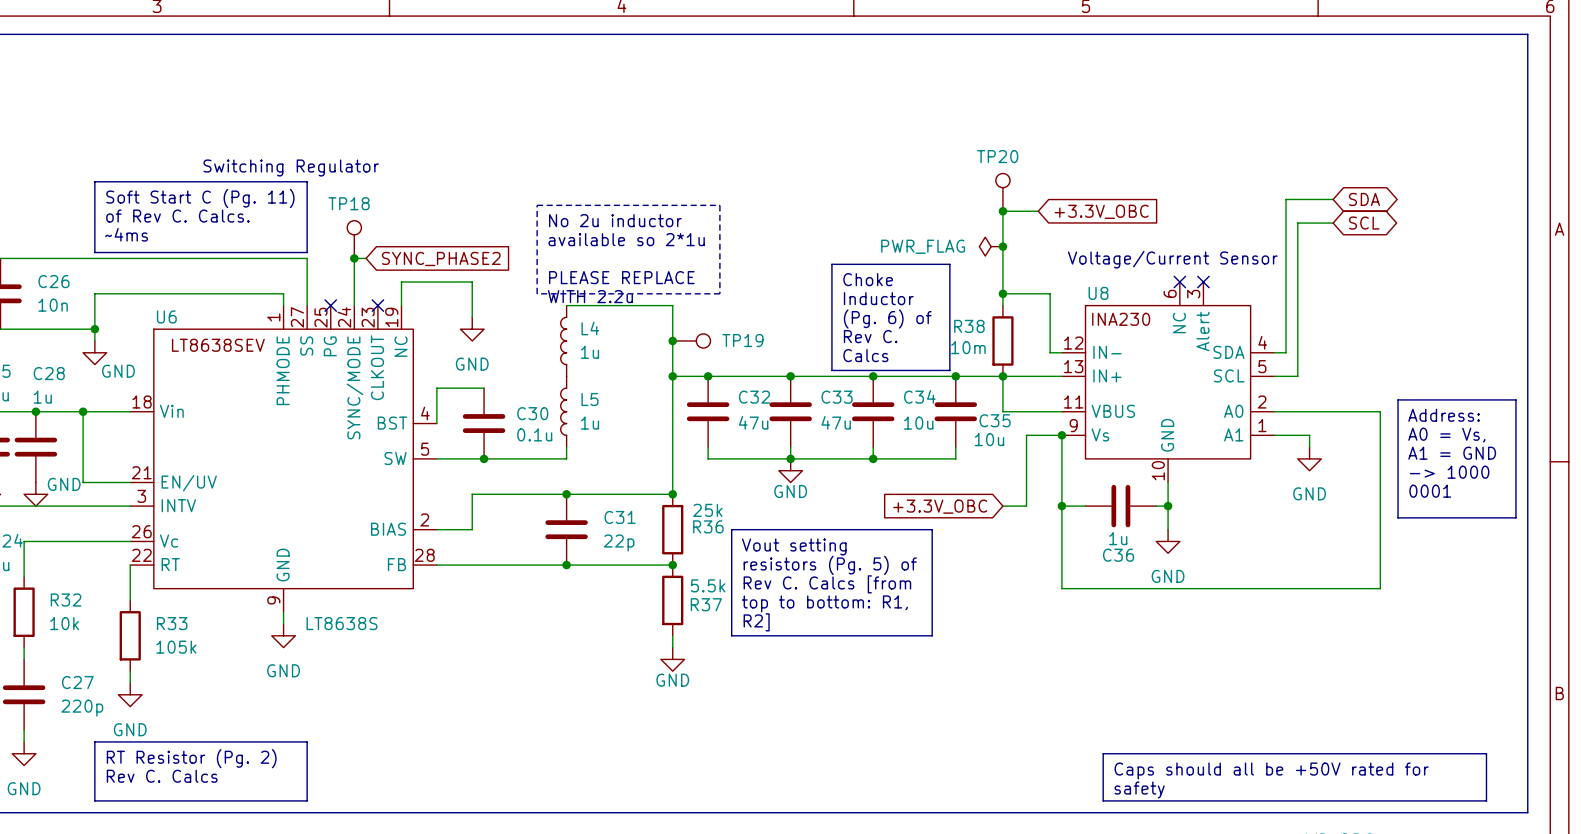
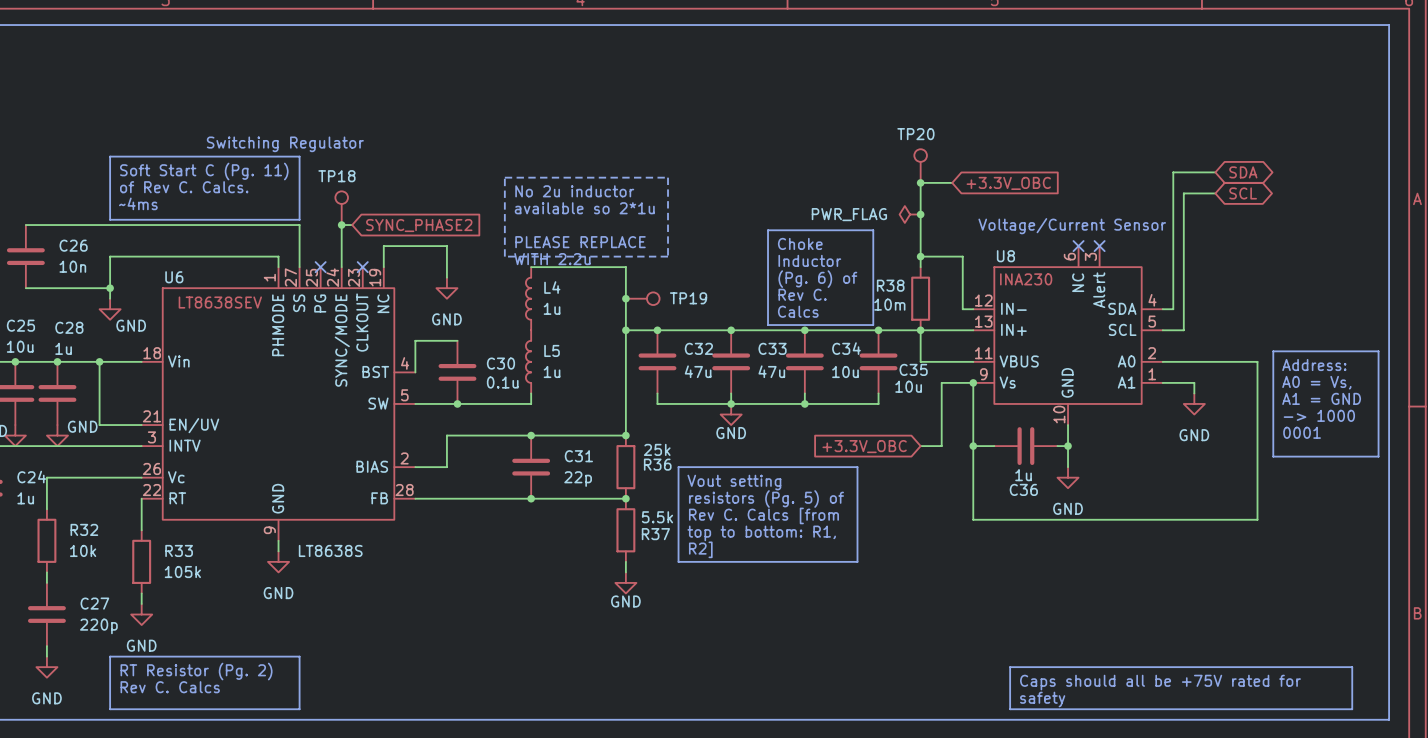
text: Caps should all be +50V rated for (1271, 771) -> Caps should all be +75V rated for (1160, 682)

